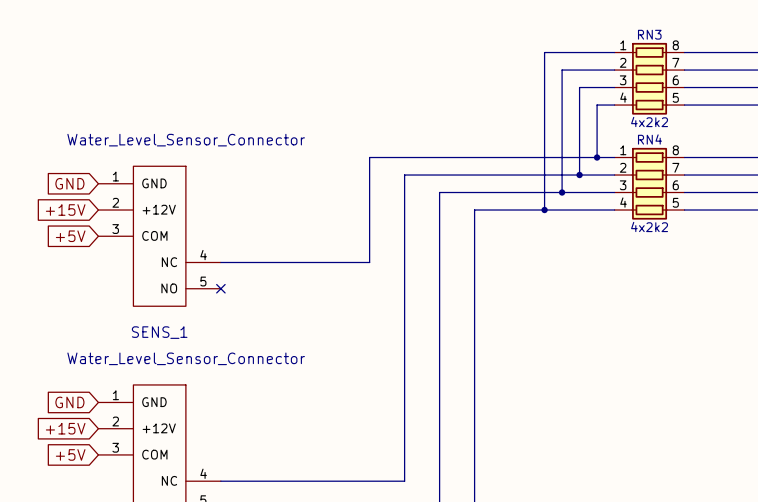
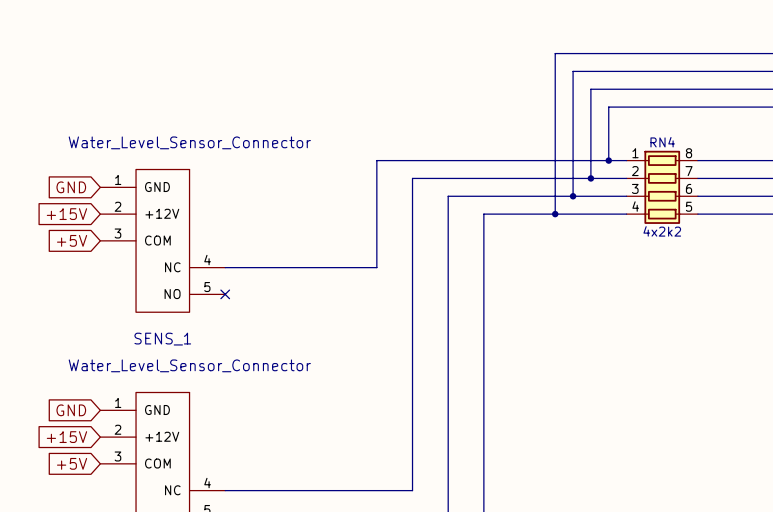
RN3: 4x2k2 (649, 78) -> none

